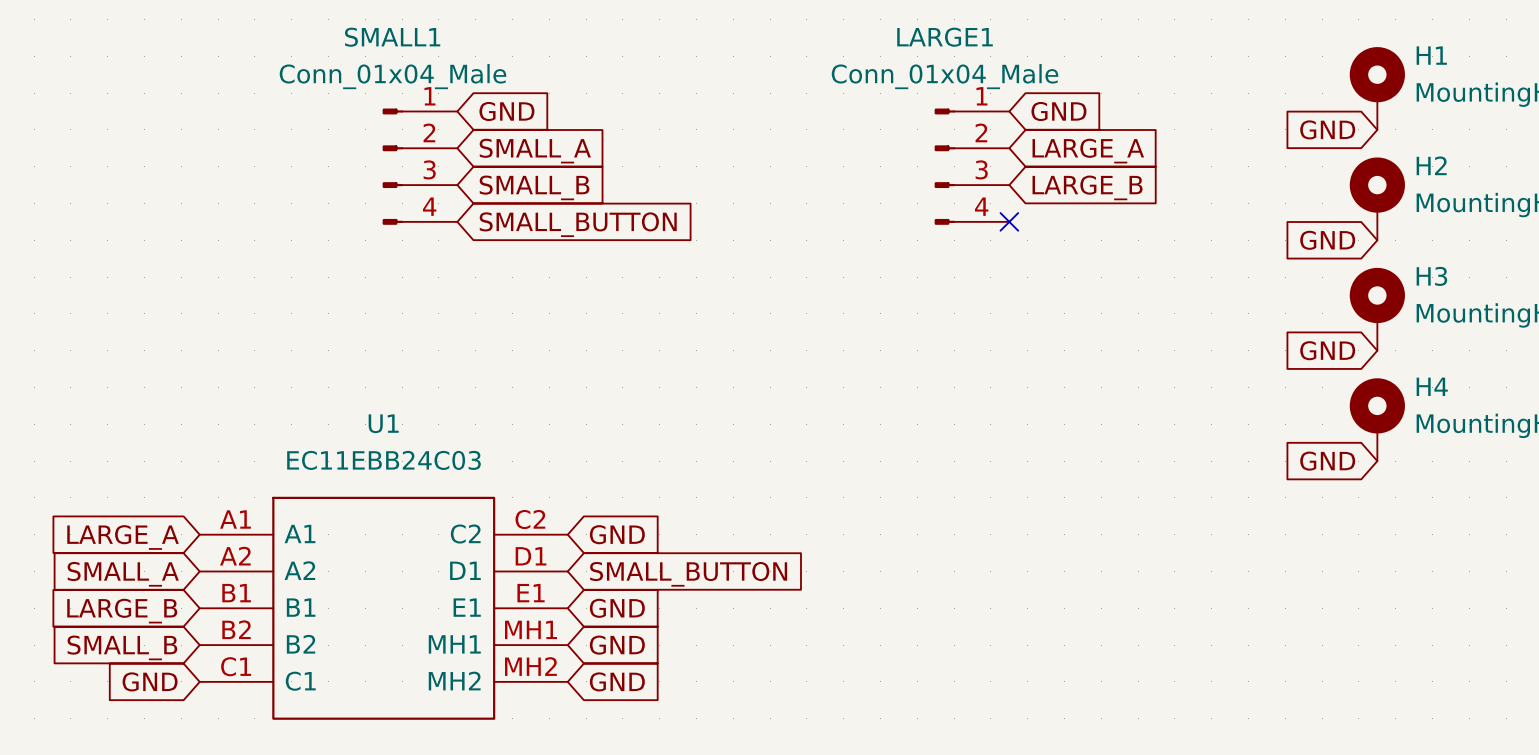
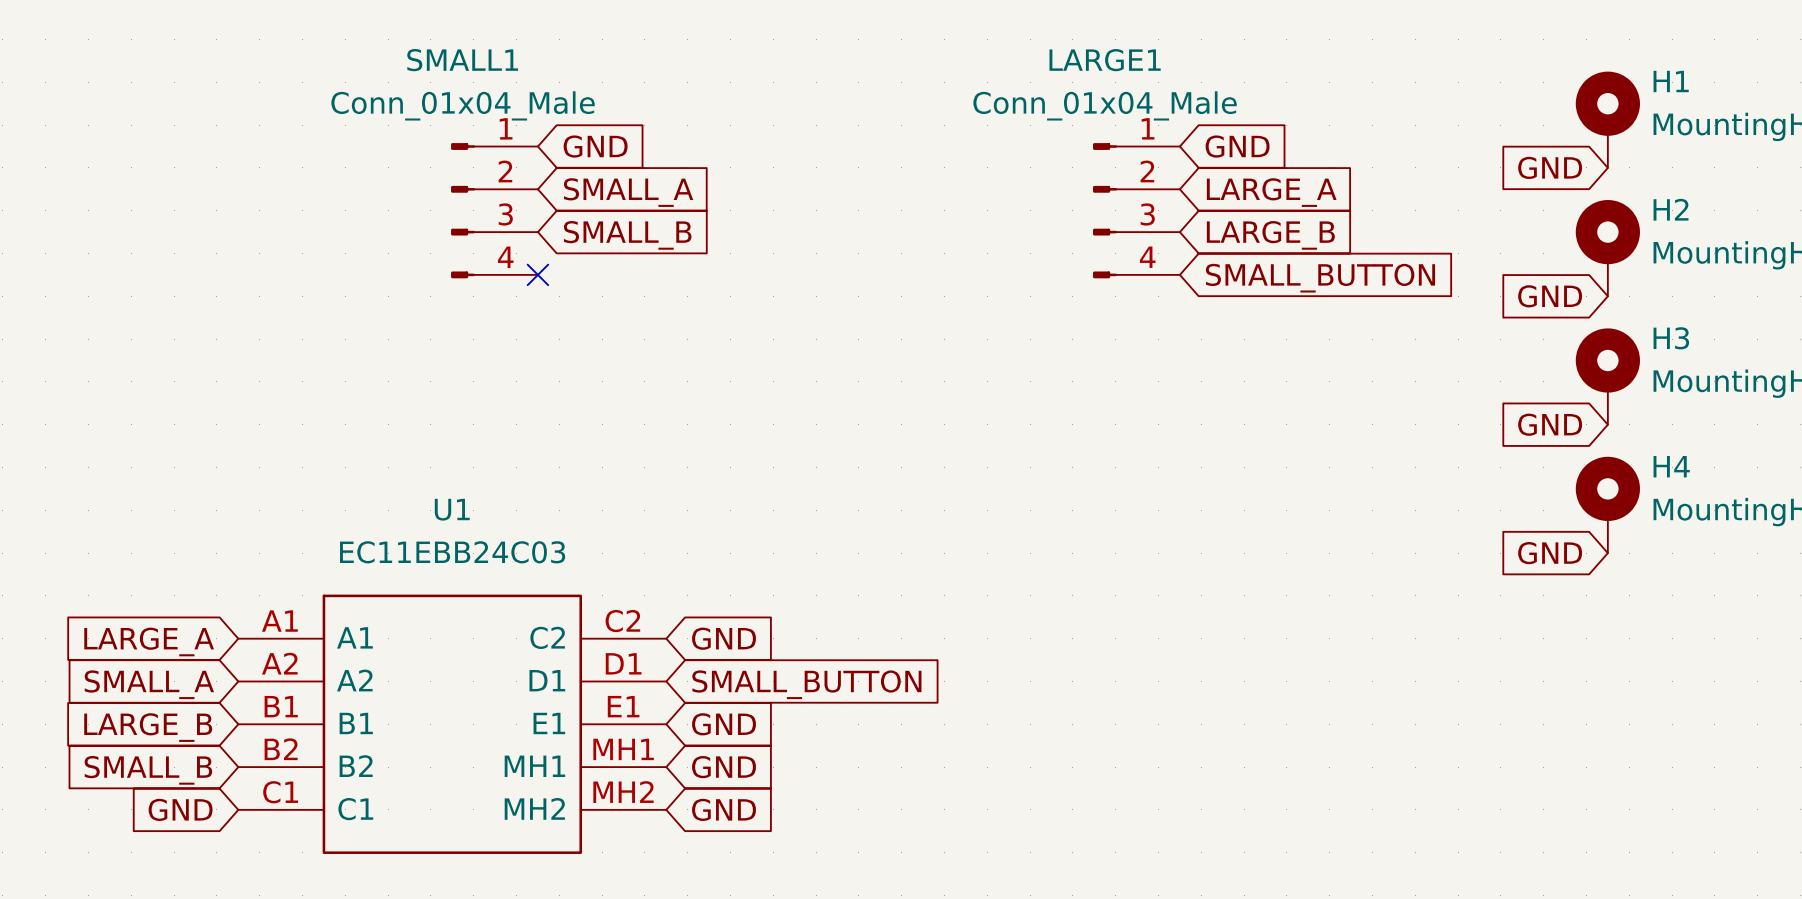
no-connect mark: none -> (537, 274)
no-connect mark: (1009, 221) -> none
global label: SMALL_BUTTON (578, 224) -> none
global label: none -> SMALL_BUTTON (1320, 278)

